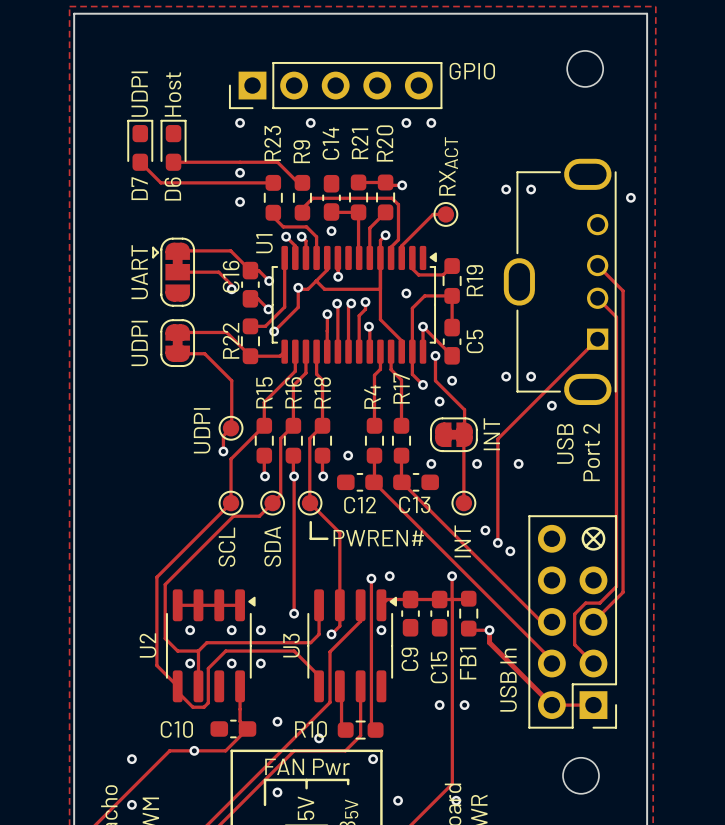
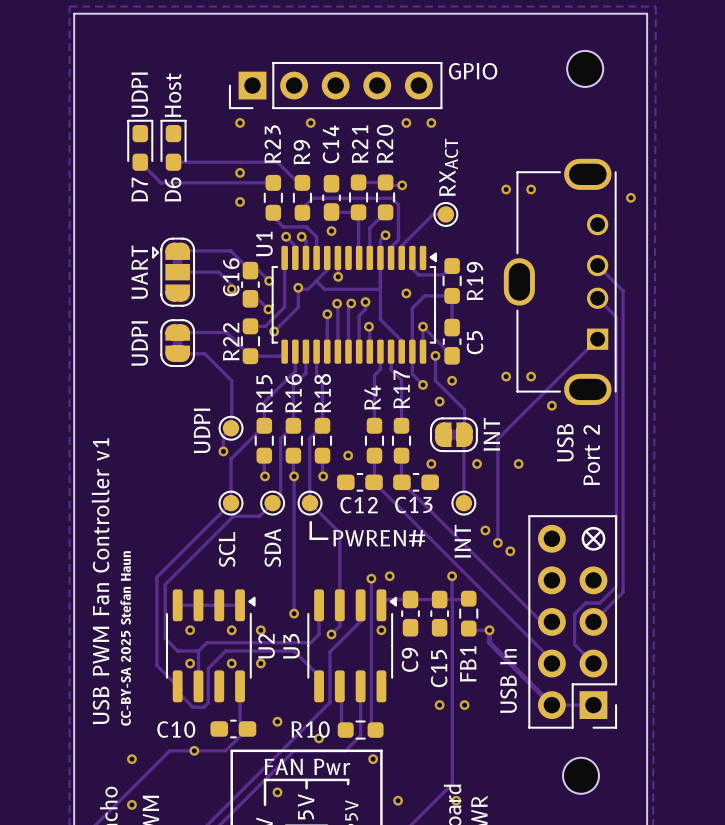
text: none -> USB PWM Fan Controller v1 (100, 581)
text: none -> CC-BY-SA 2025 Stefan Haun (125, 638)
U2 name position: U2 (147, 645) -> U2 (266, 646)

